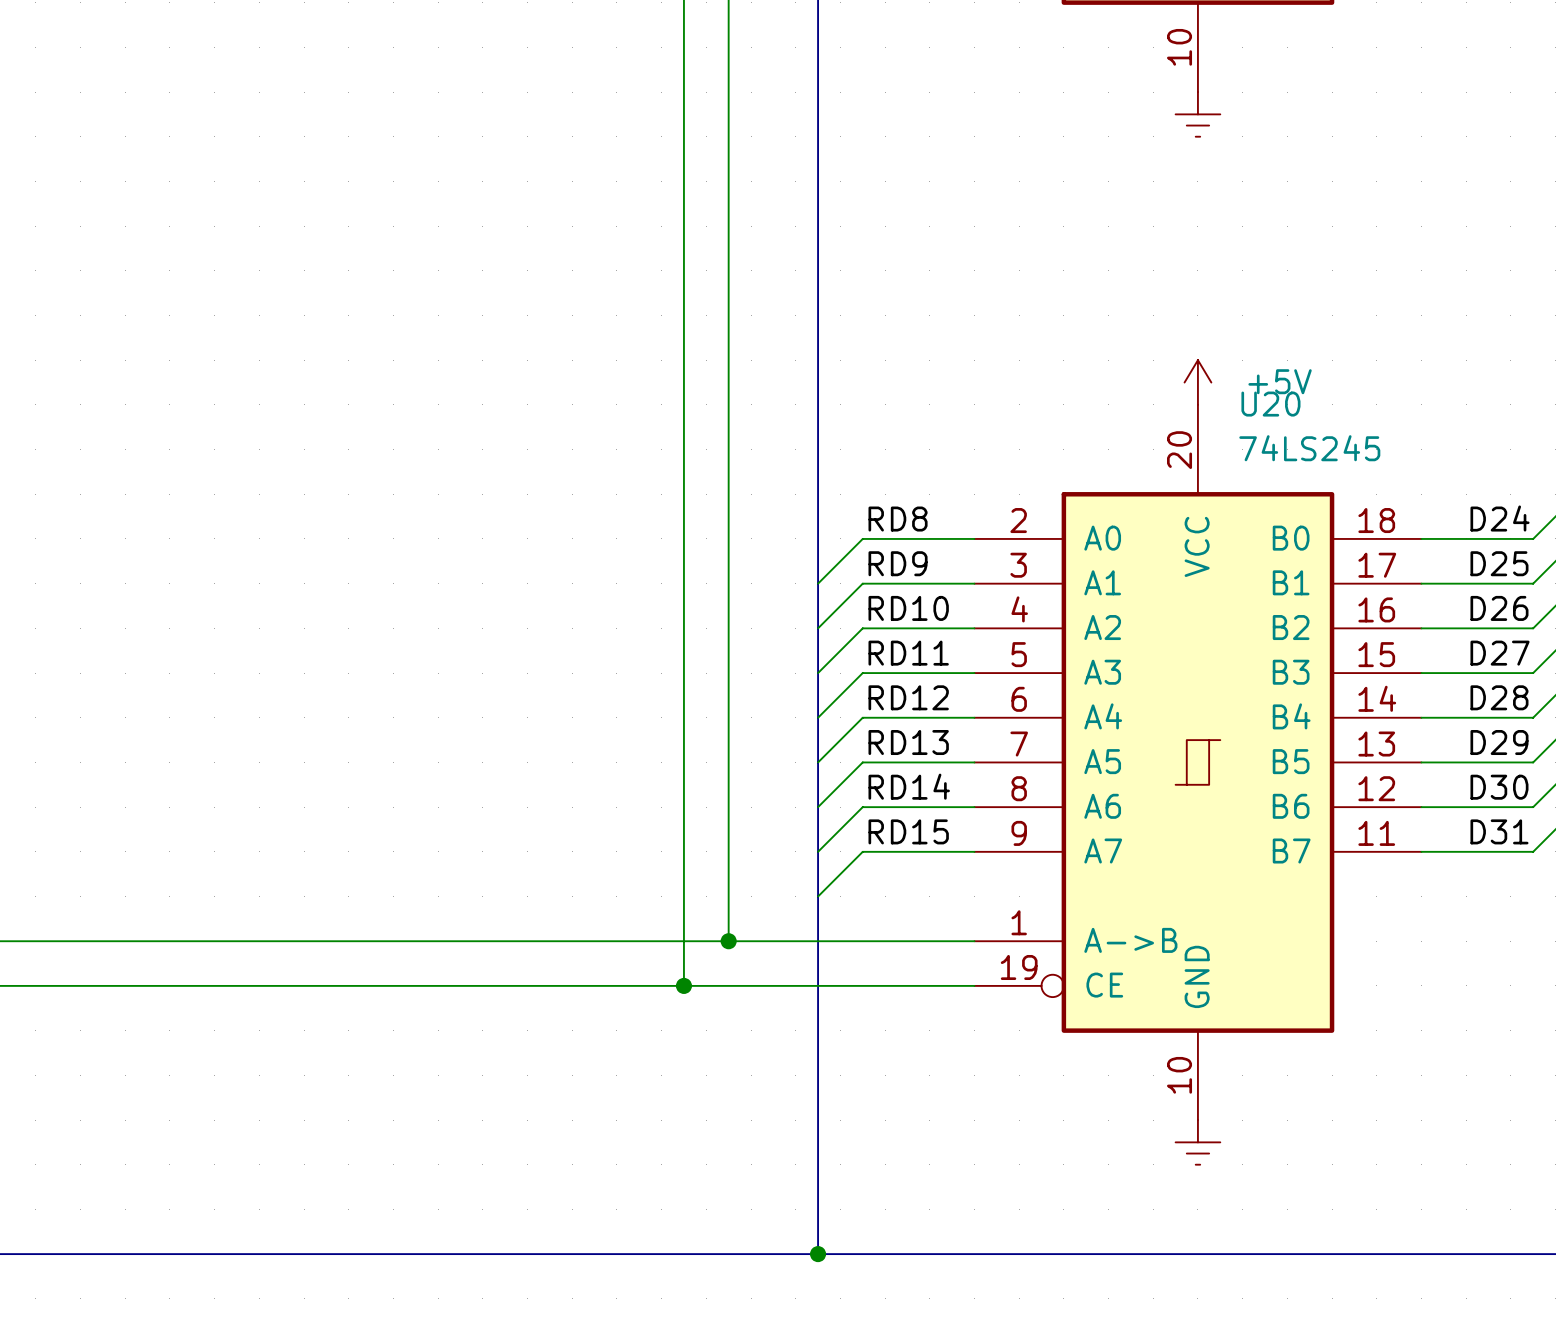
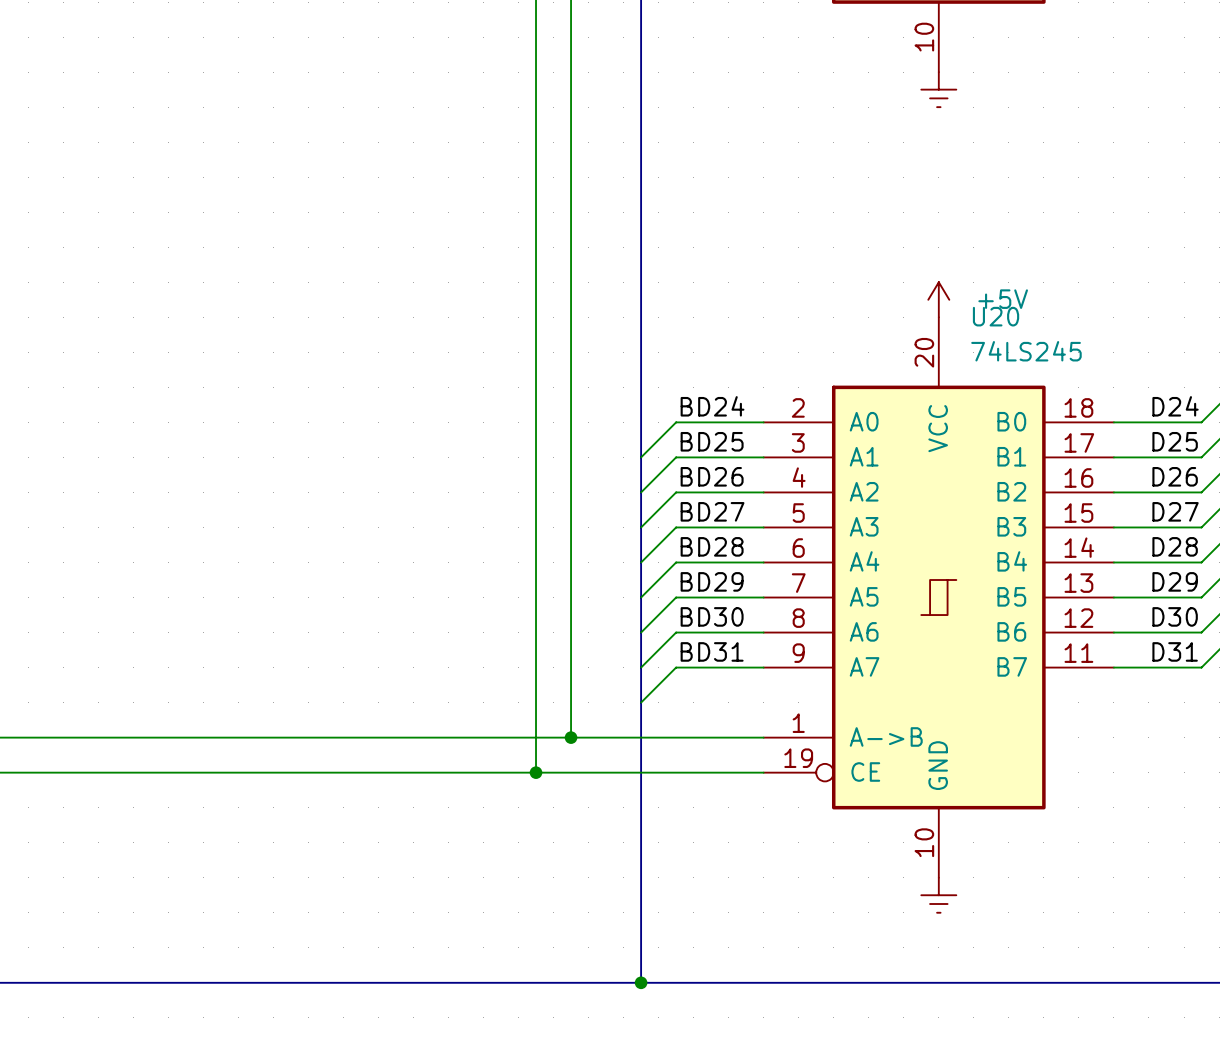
label: RD8 (898, 519) -> BD24 (712, 406)
label: RD9 (898, 563) -> BD25 (712, 441)
label: RD10 (908, 608) -> BD26 (712, 476)
label: RD11 (908, 653) -> BD27 (712, 511)
label: RD12 (908, 697) -> BD28 (712, 546)
label: RD13 (908, 742) -> BD29 (712, 581)
label: RD14 (909, 786) -> BD30 (712, 616)
label: RD15 (908, 831) -> BD31 (712, 651)

